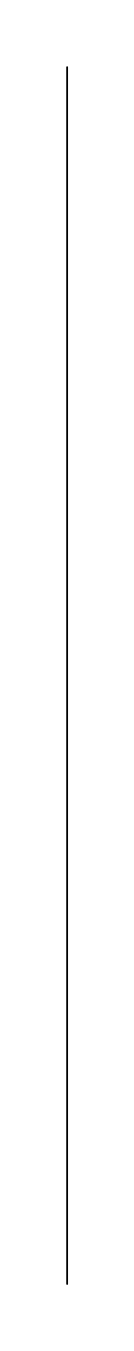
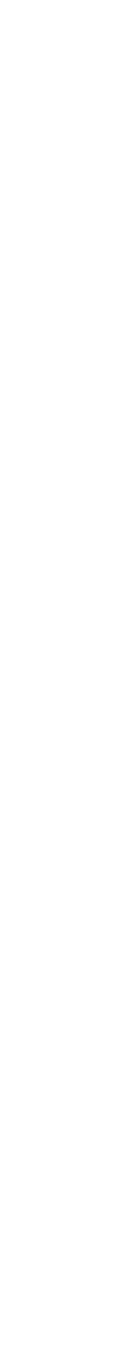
board edge: (67, 67) (67, 1284) -> none

